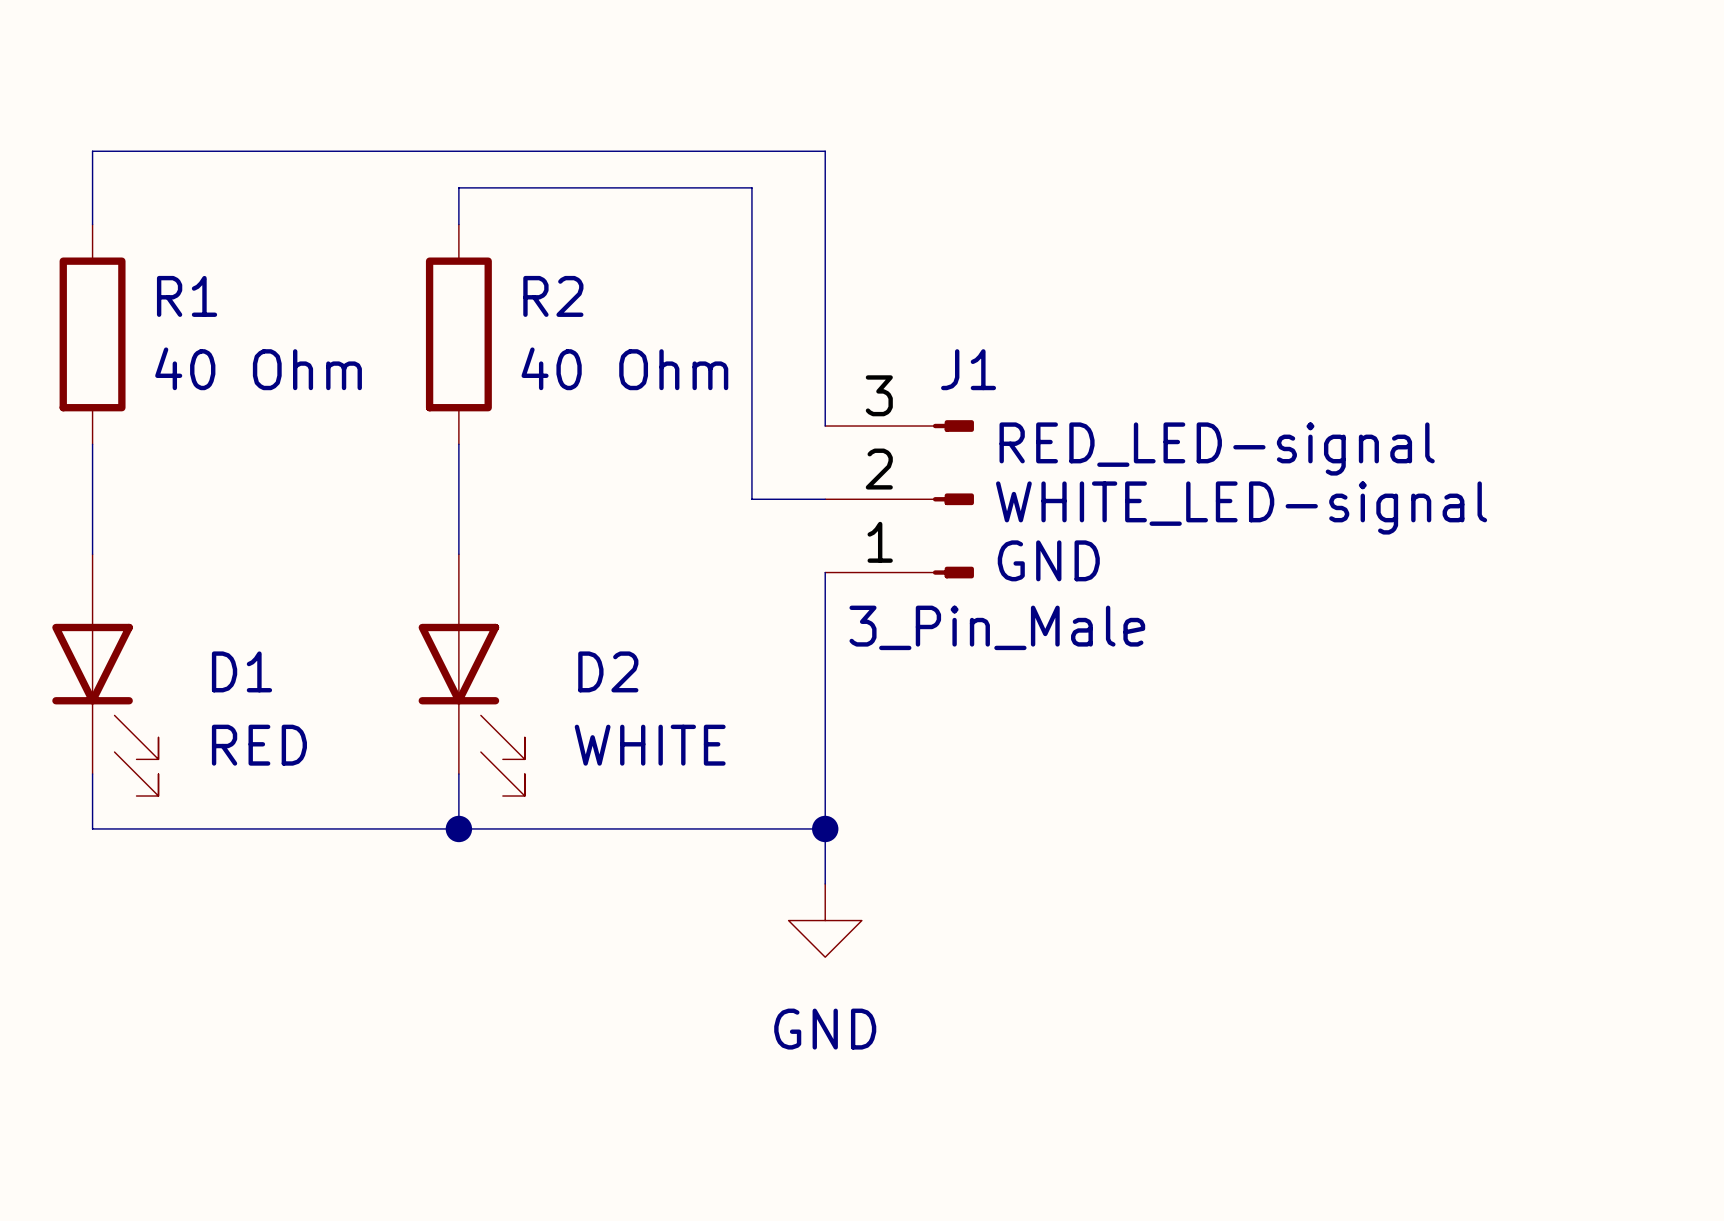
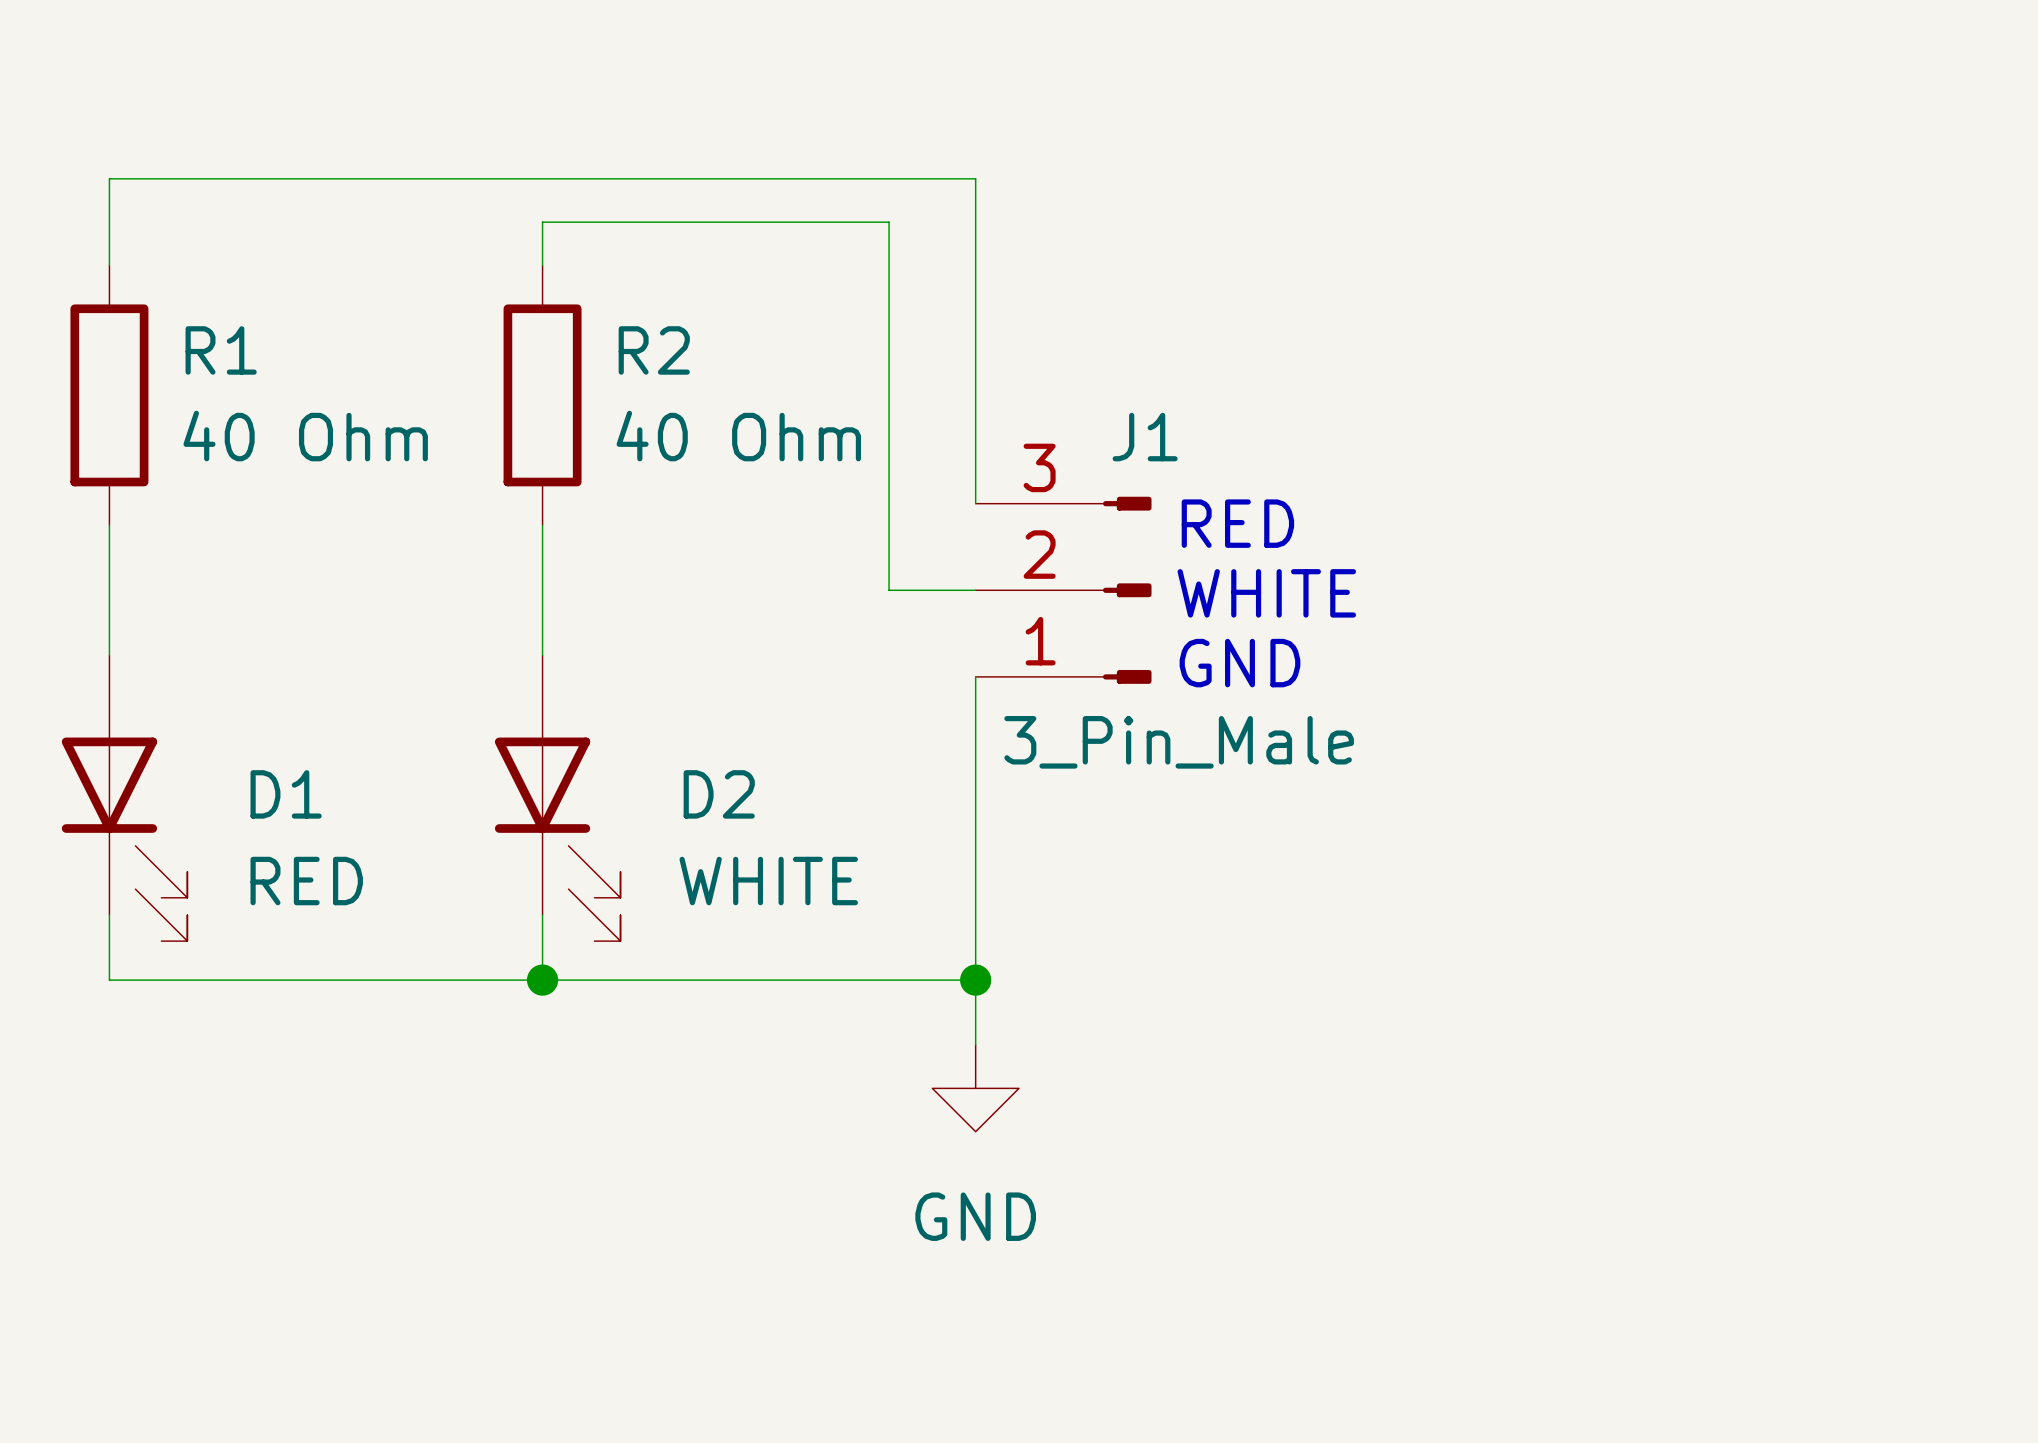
text: RED_LED-signal (1217, 448) -> RED (1237, 523)
text: WHITE_LED-signal (1241, 507) -> WHITE (1266, 593)

